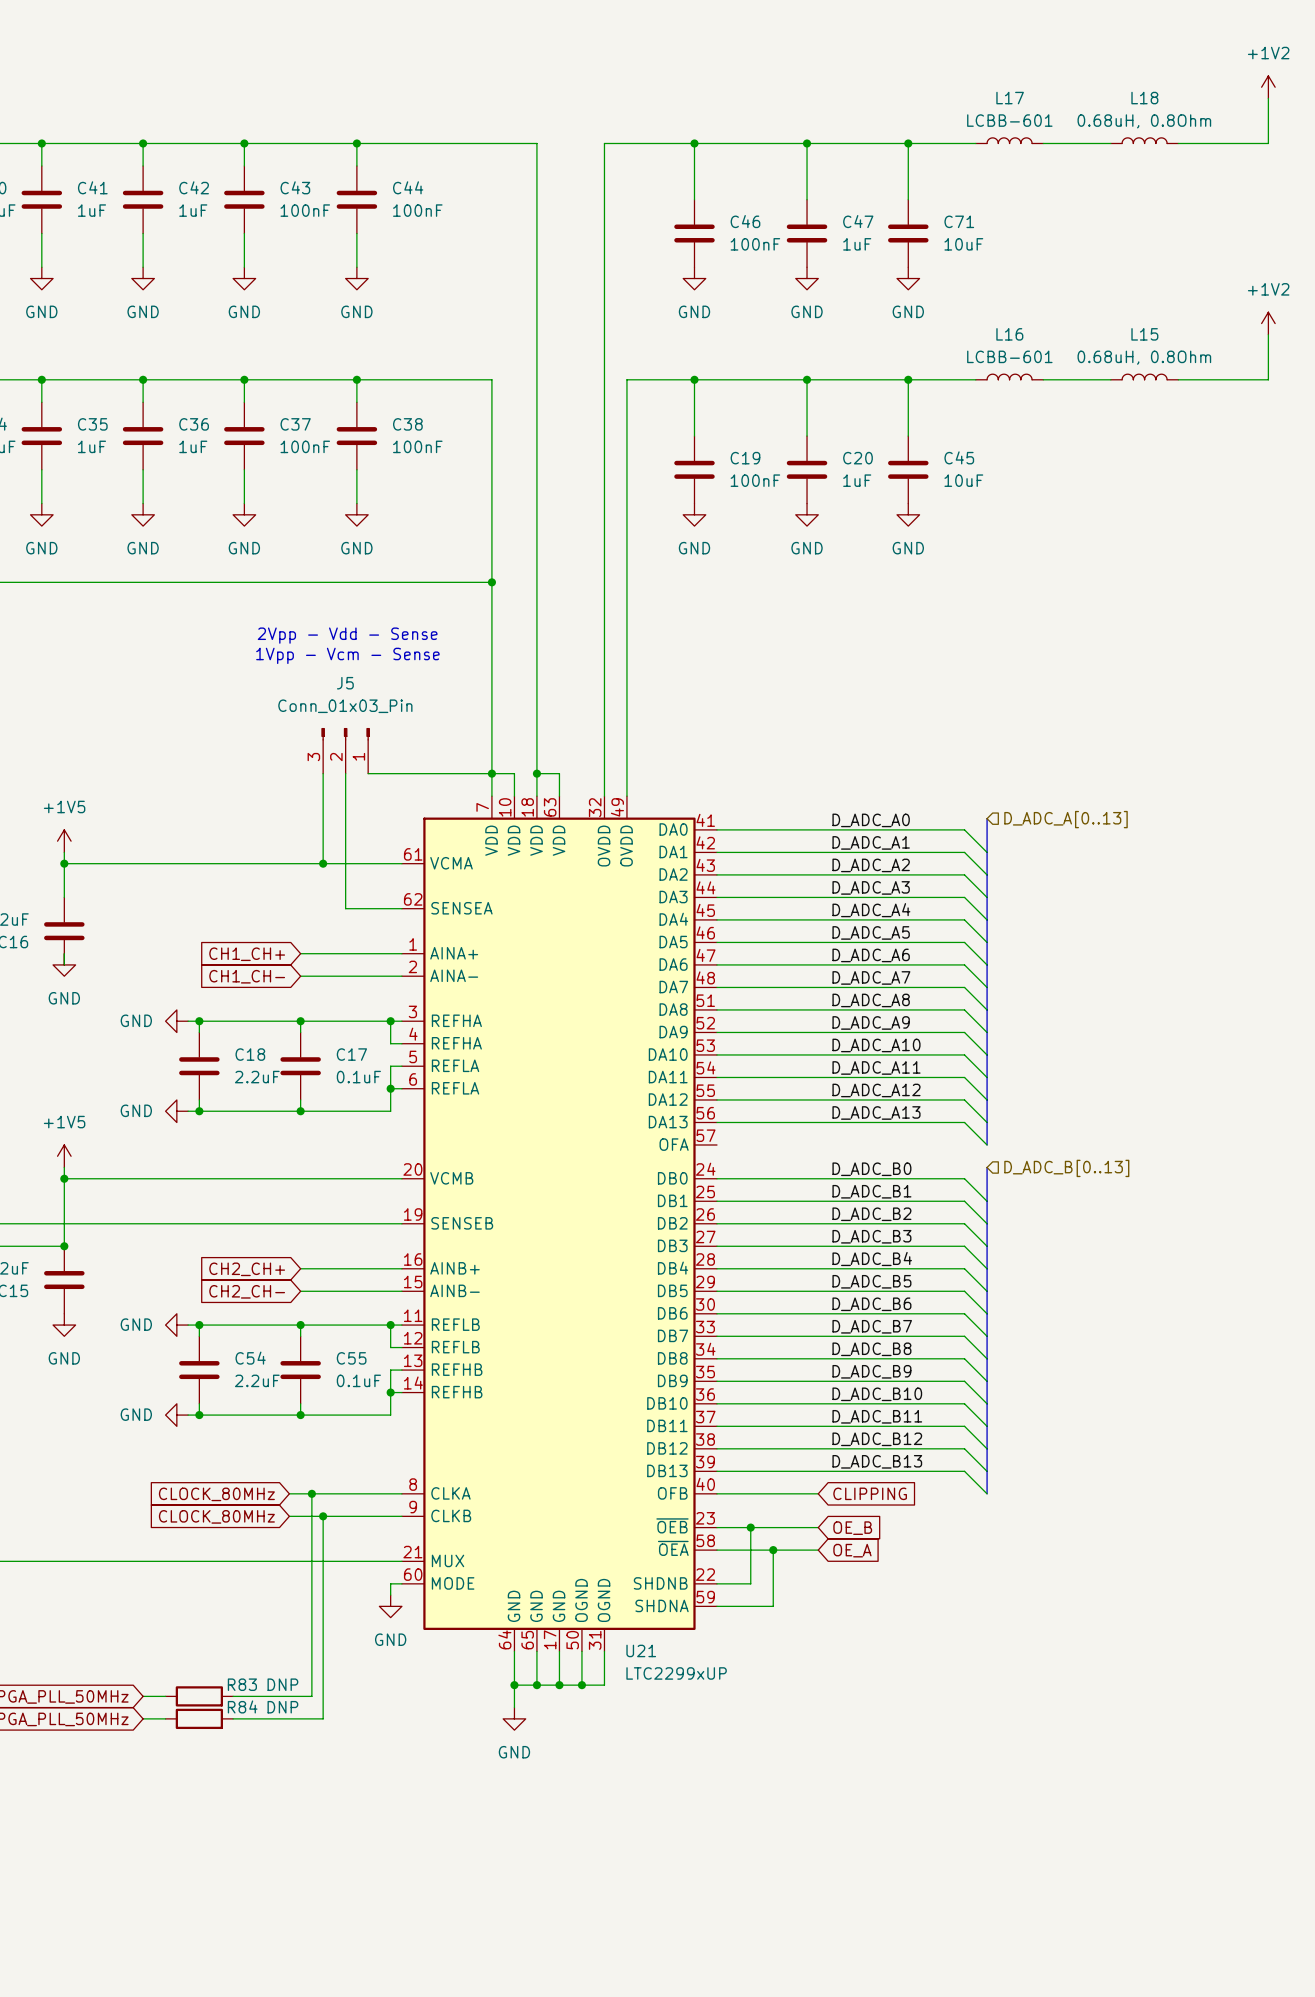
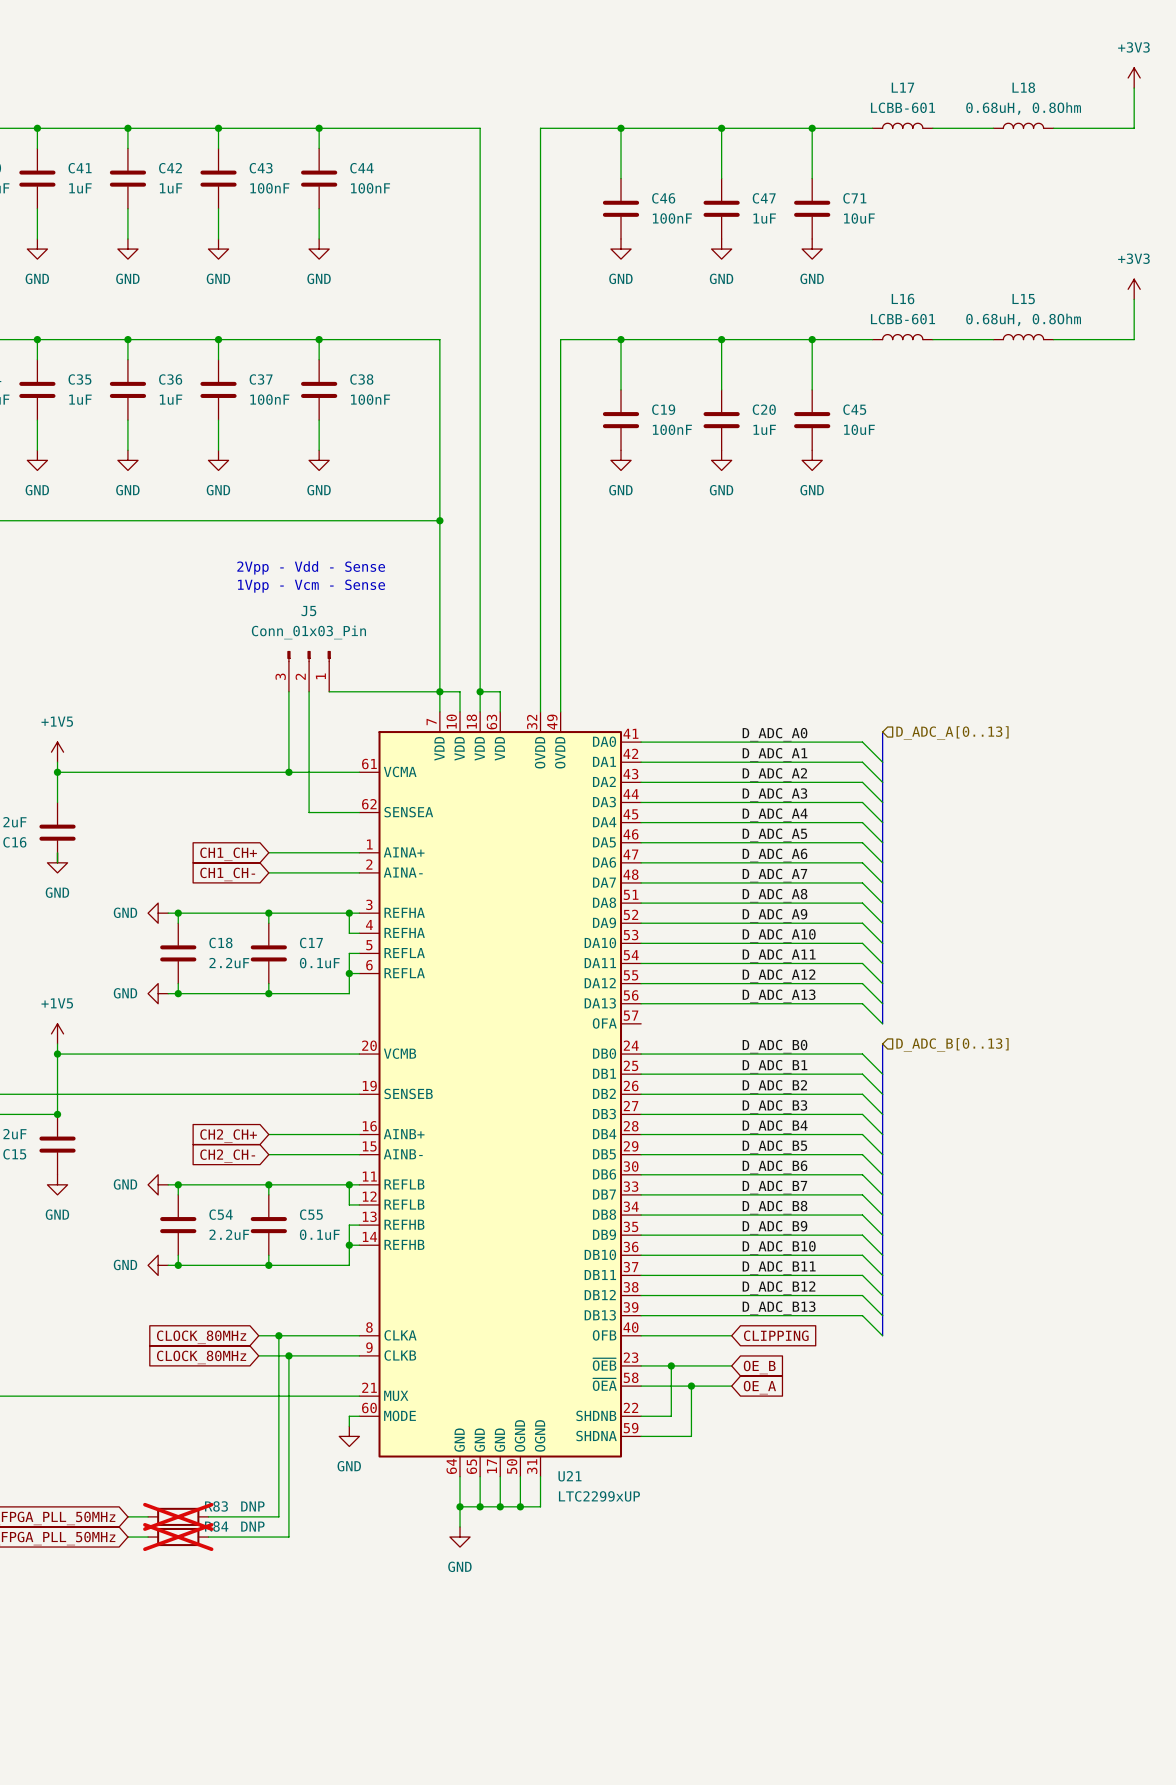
power symbol: +1V2 (1268, 87) -> +3V3 (1134, 77)
power symbol: +1V2 (1268, 323) -> +3V3 (1134, 289)
R83 do-not-place cross: none -> (178, 1516)
R84 do-not-place cross: none -> (178, 1537)

